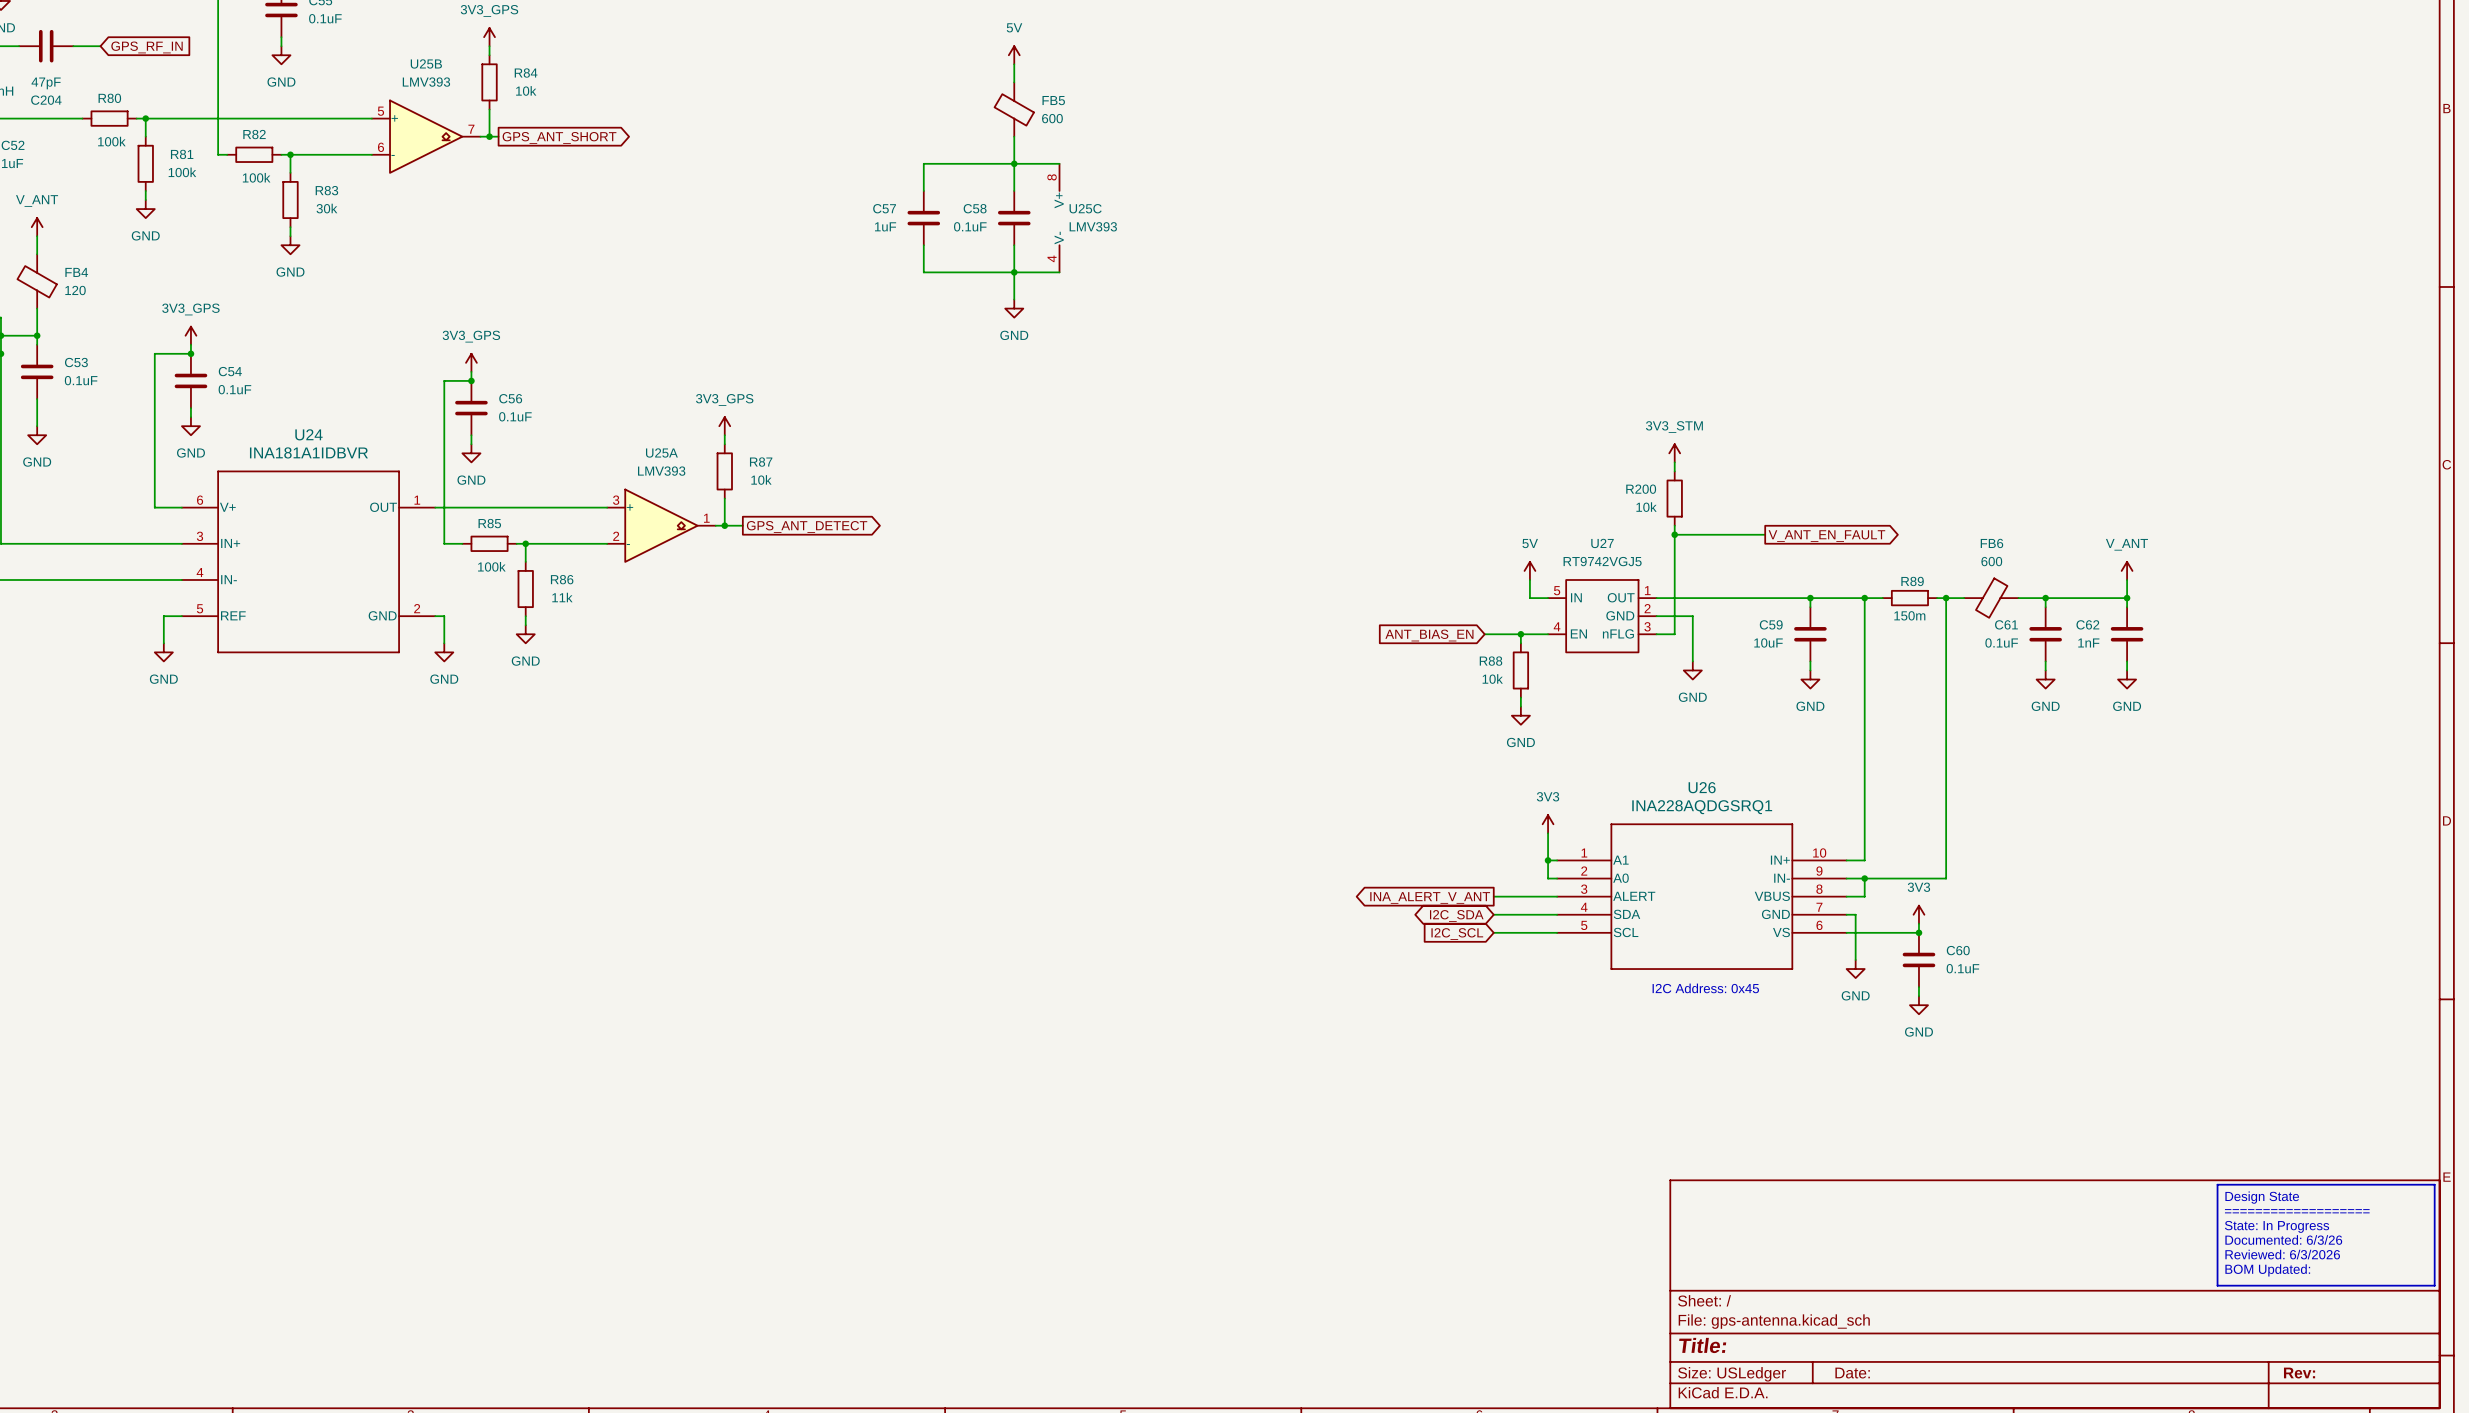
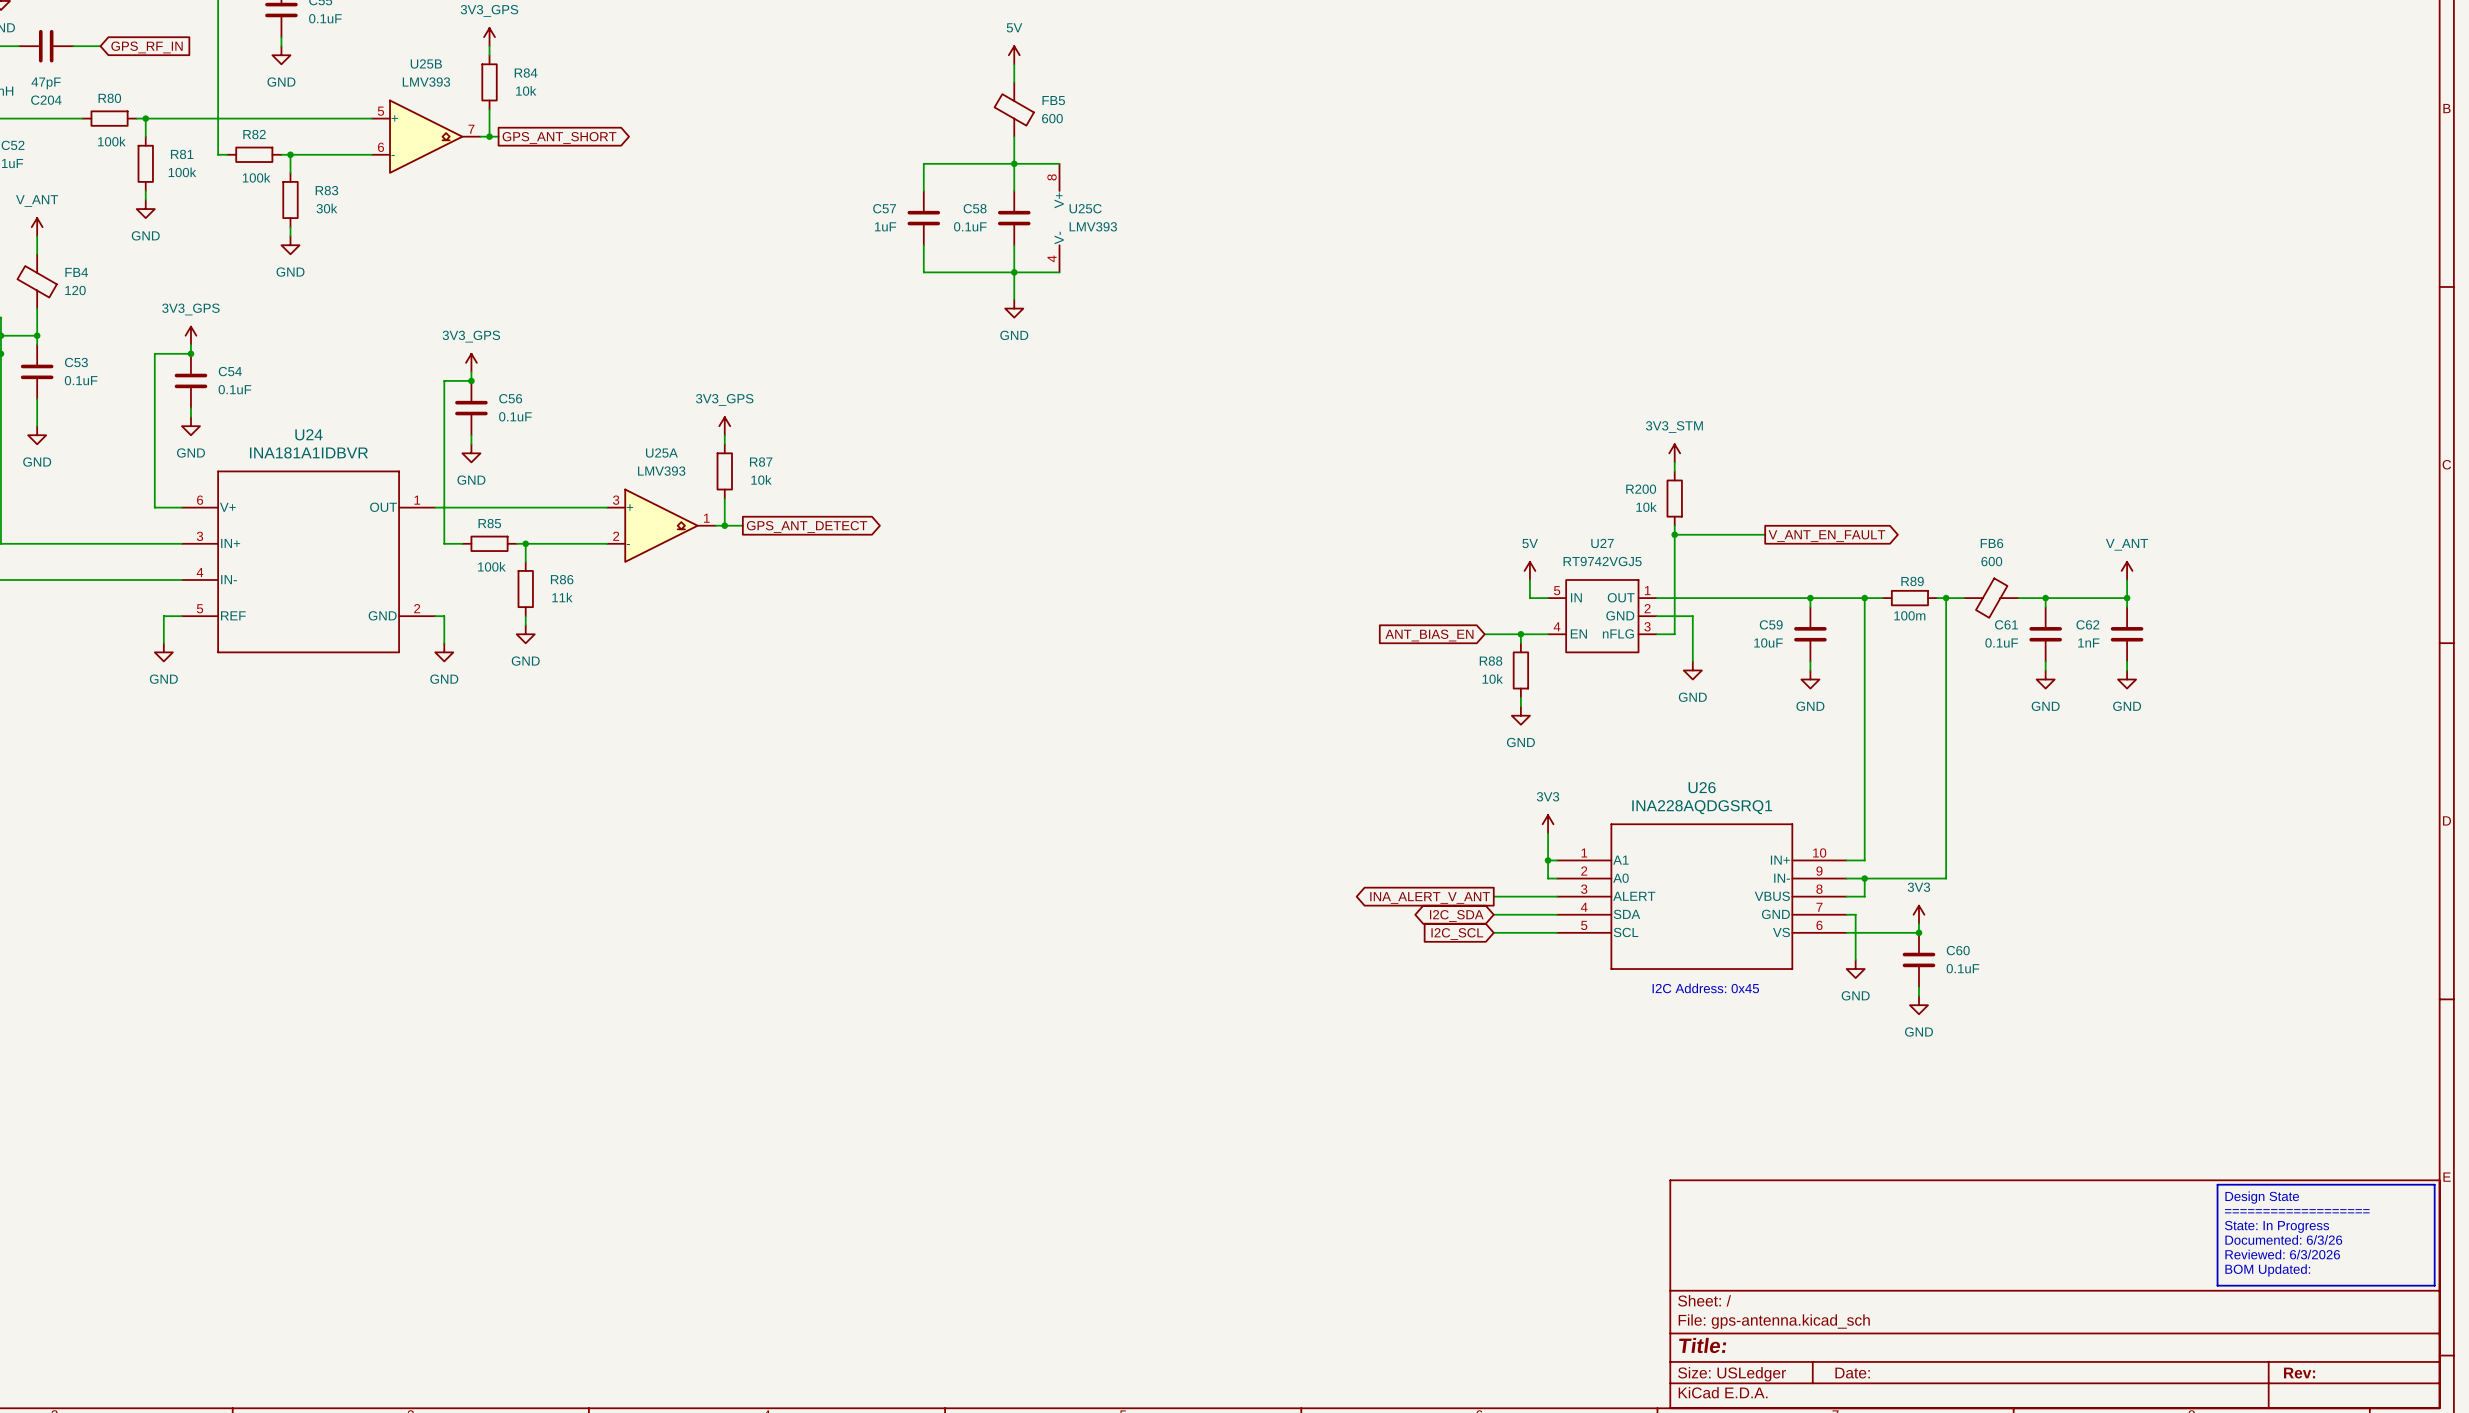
R89 value: 150m (1909, 615) -> 100m (1909, 615)

